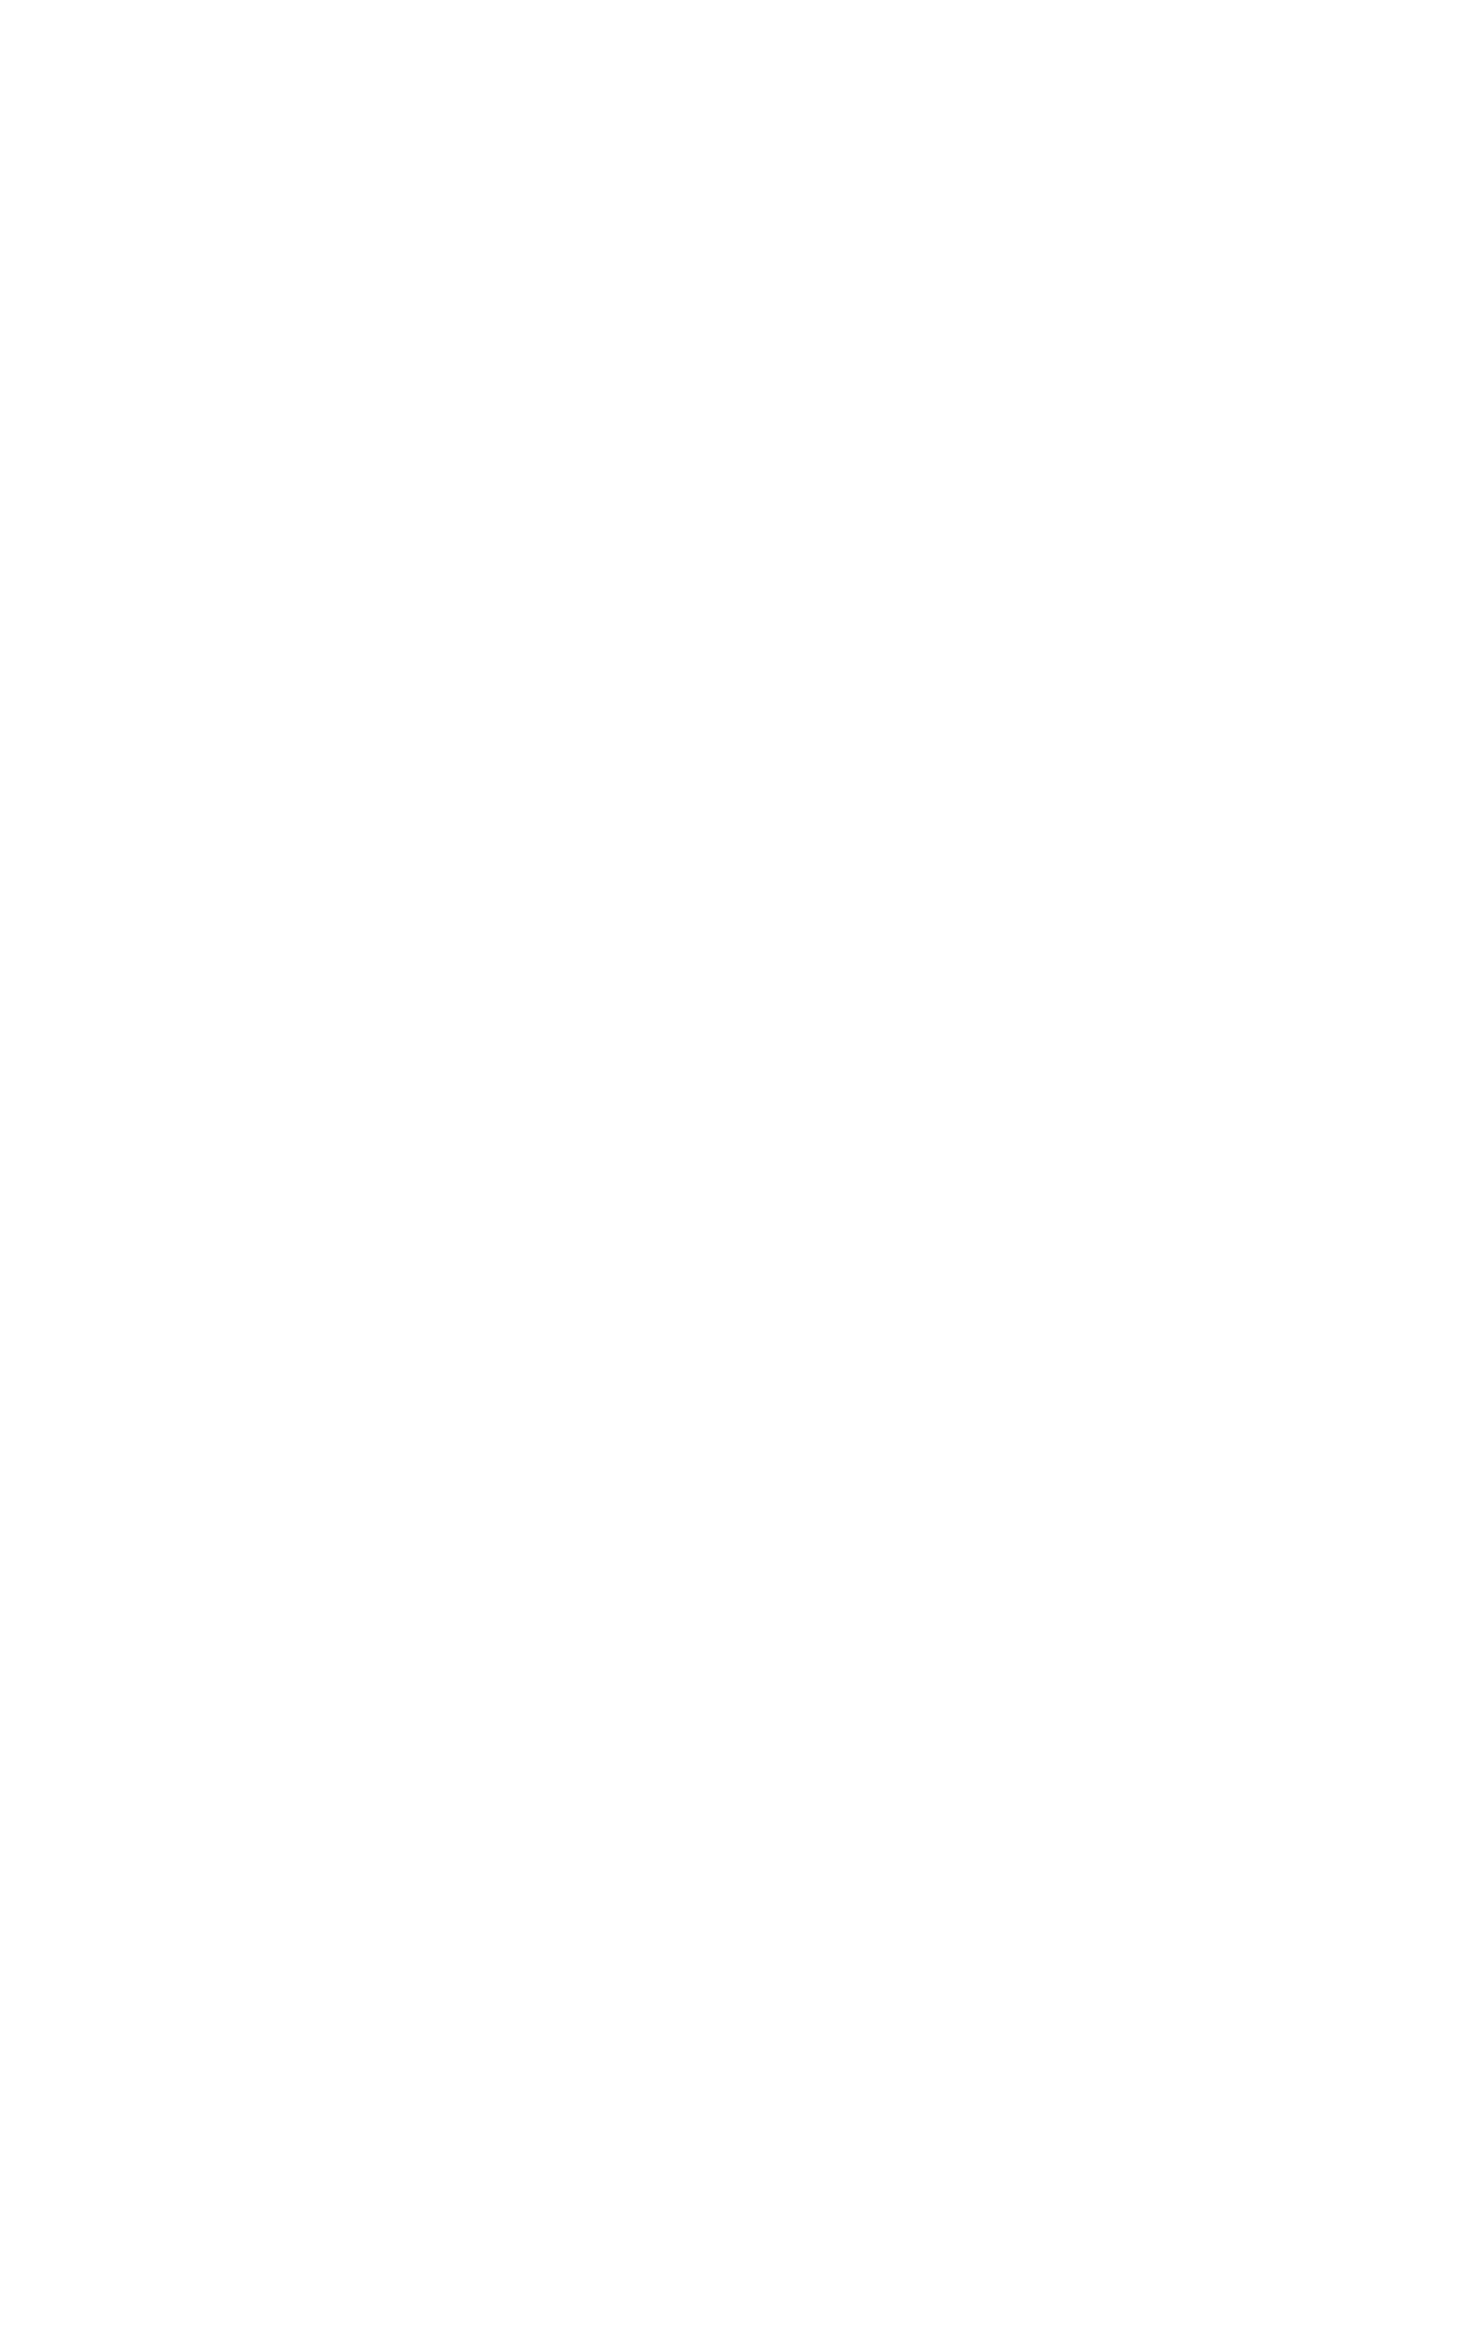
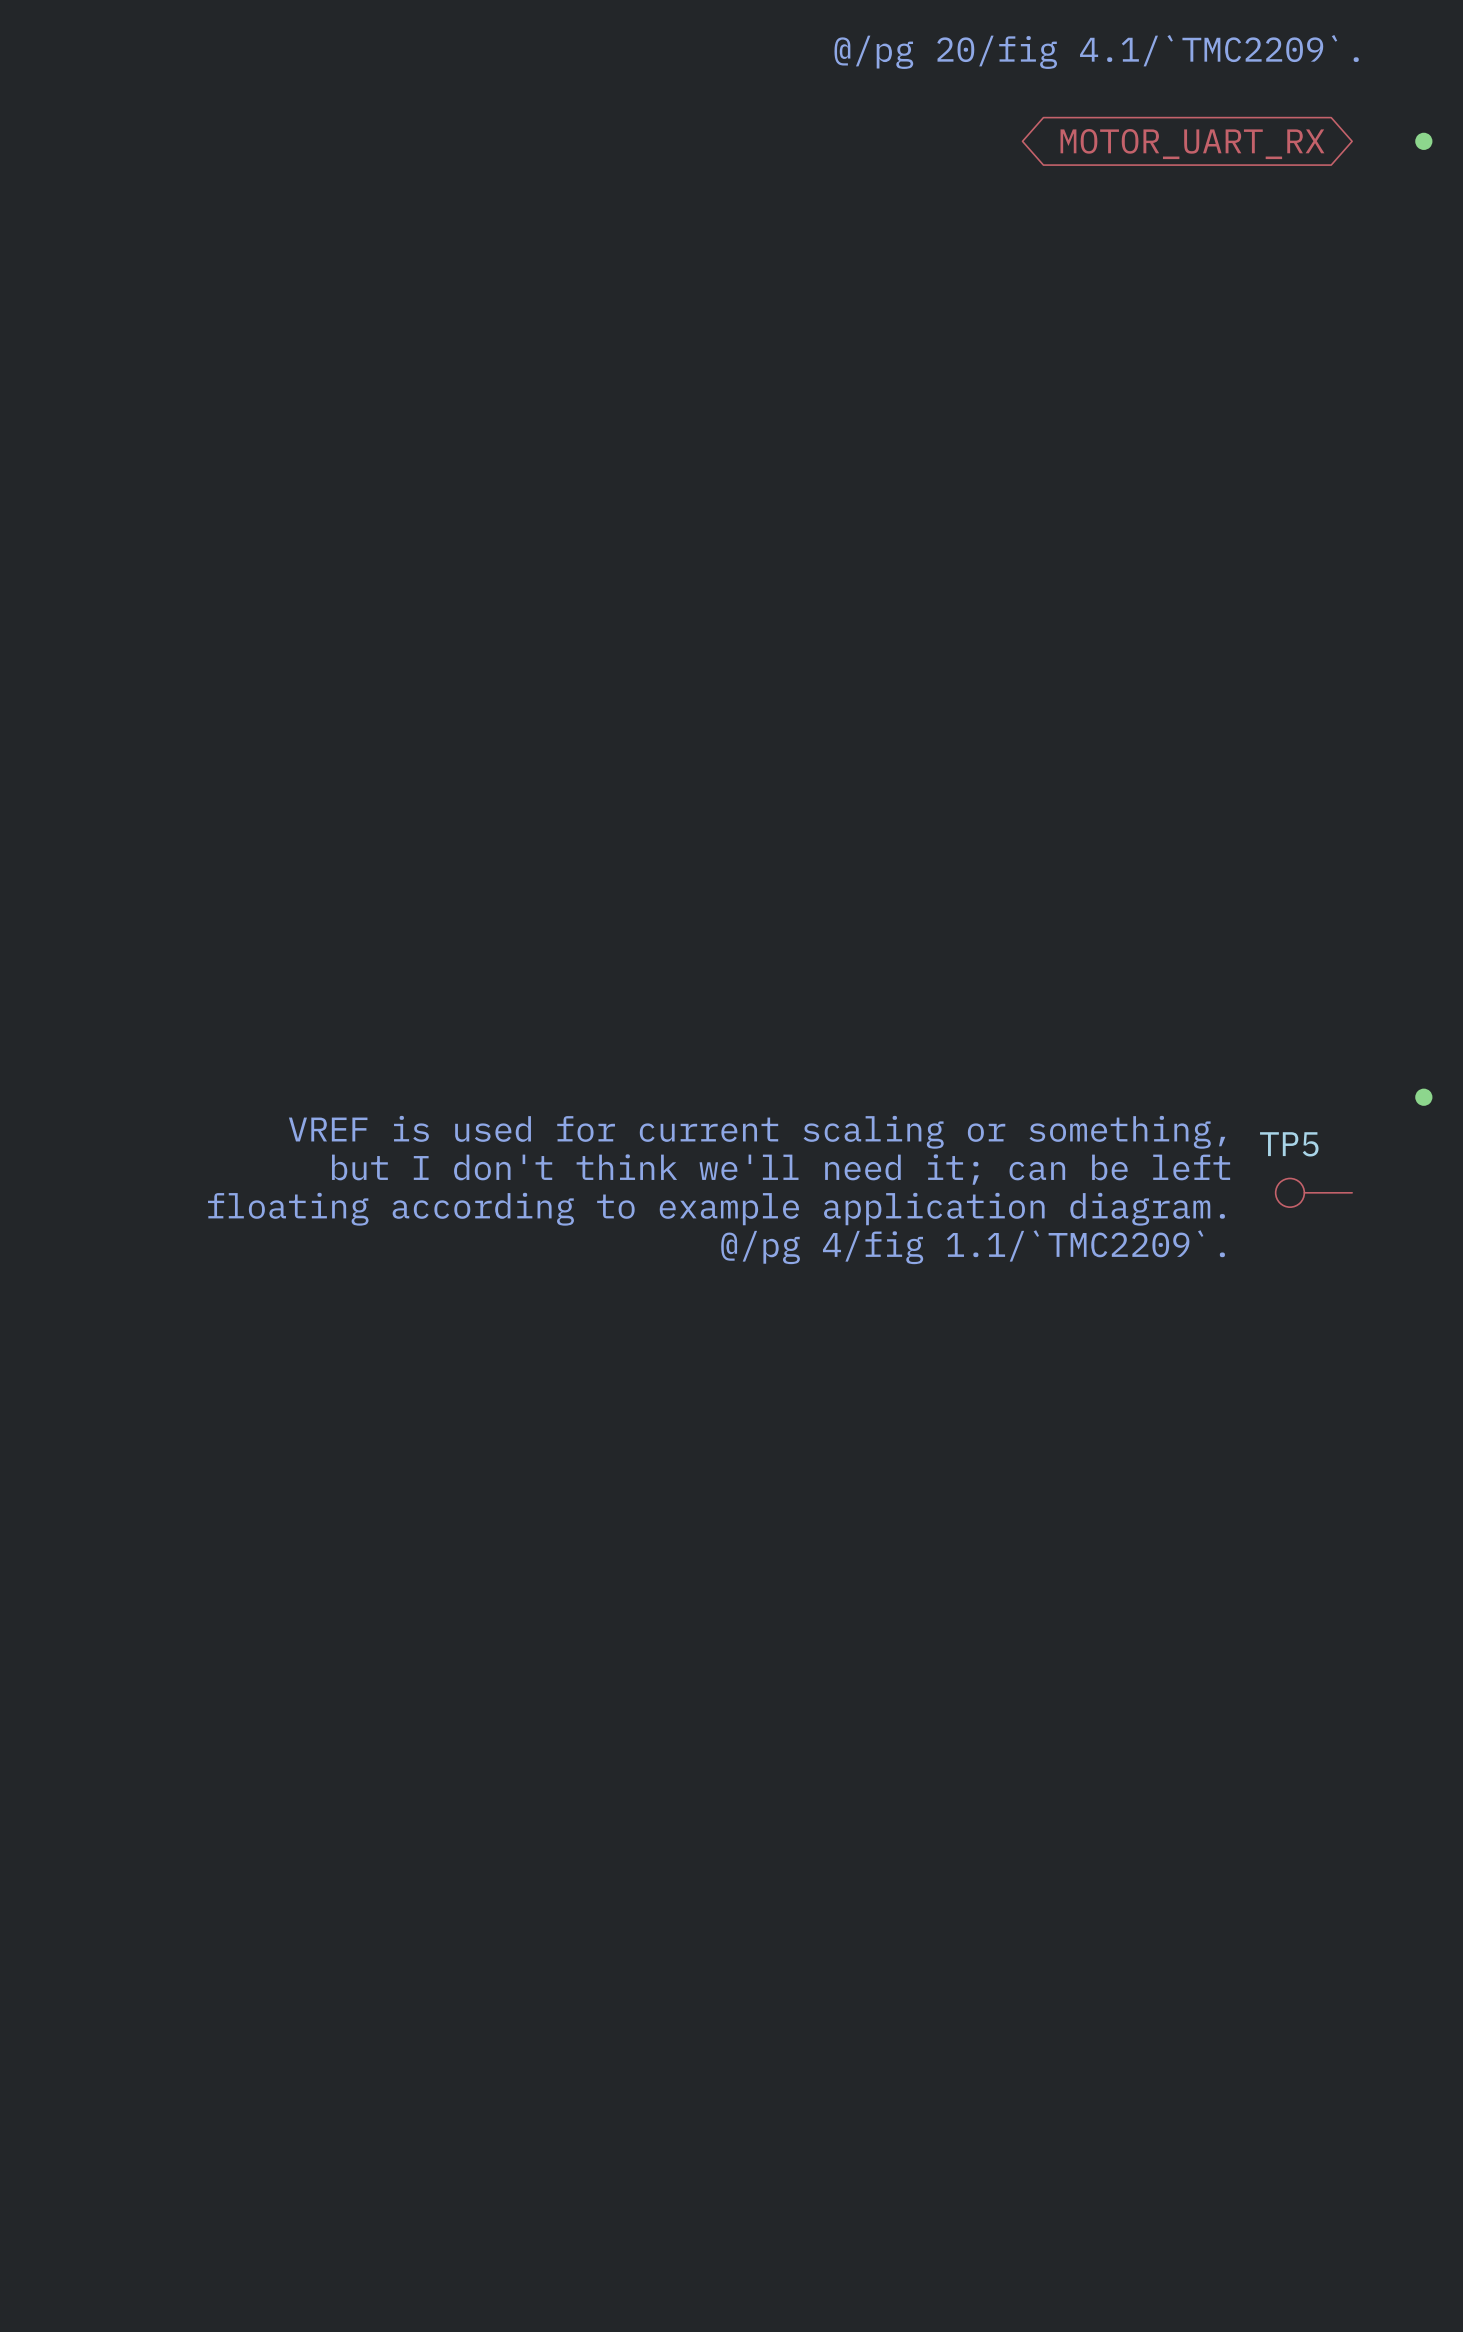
text: none -> @/pg 20/fig 4.1/`TMC2209`. (1096, 51)
junction: none -> (1423, 141)
global label: none -> MOTOR_UART_RX (1192, 144)
junction: none -> (1423, 1097)
text: none -> VREF is used for current scaling or something, (757, 1132)
text: none -> but I don't think we'll need it; can be left (781, 1169)
TP5: none -> (1313, 1192)
text: none -> floating according to example application diagram. (716, 1209)
text: none -> @/pg 4/fig 1.1/`TMC2209`. (973, 1247)

